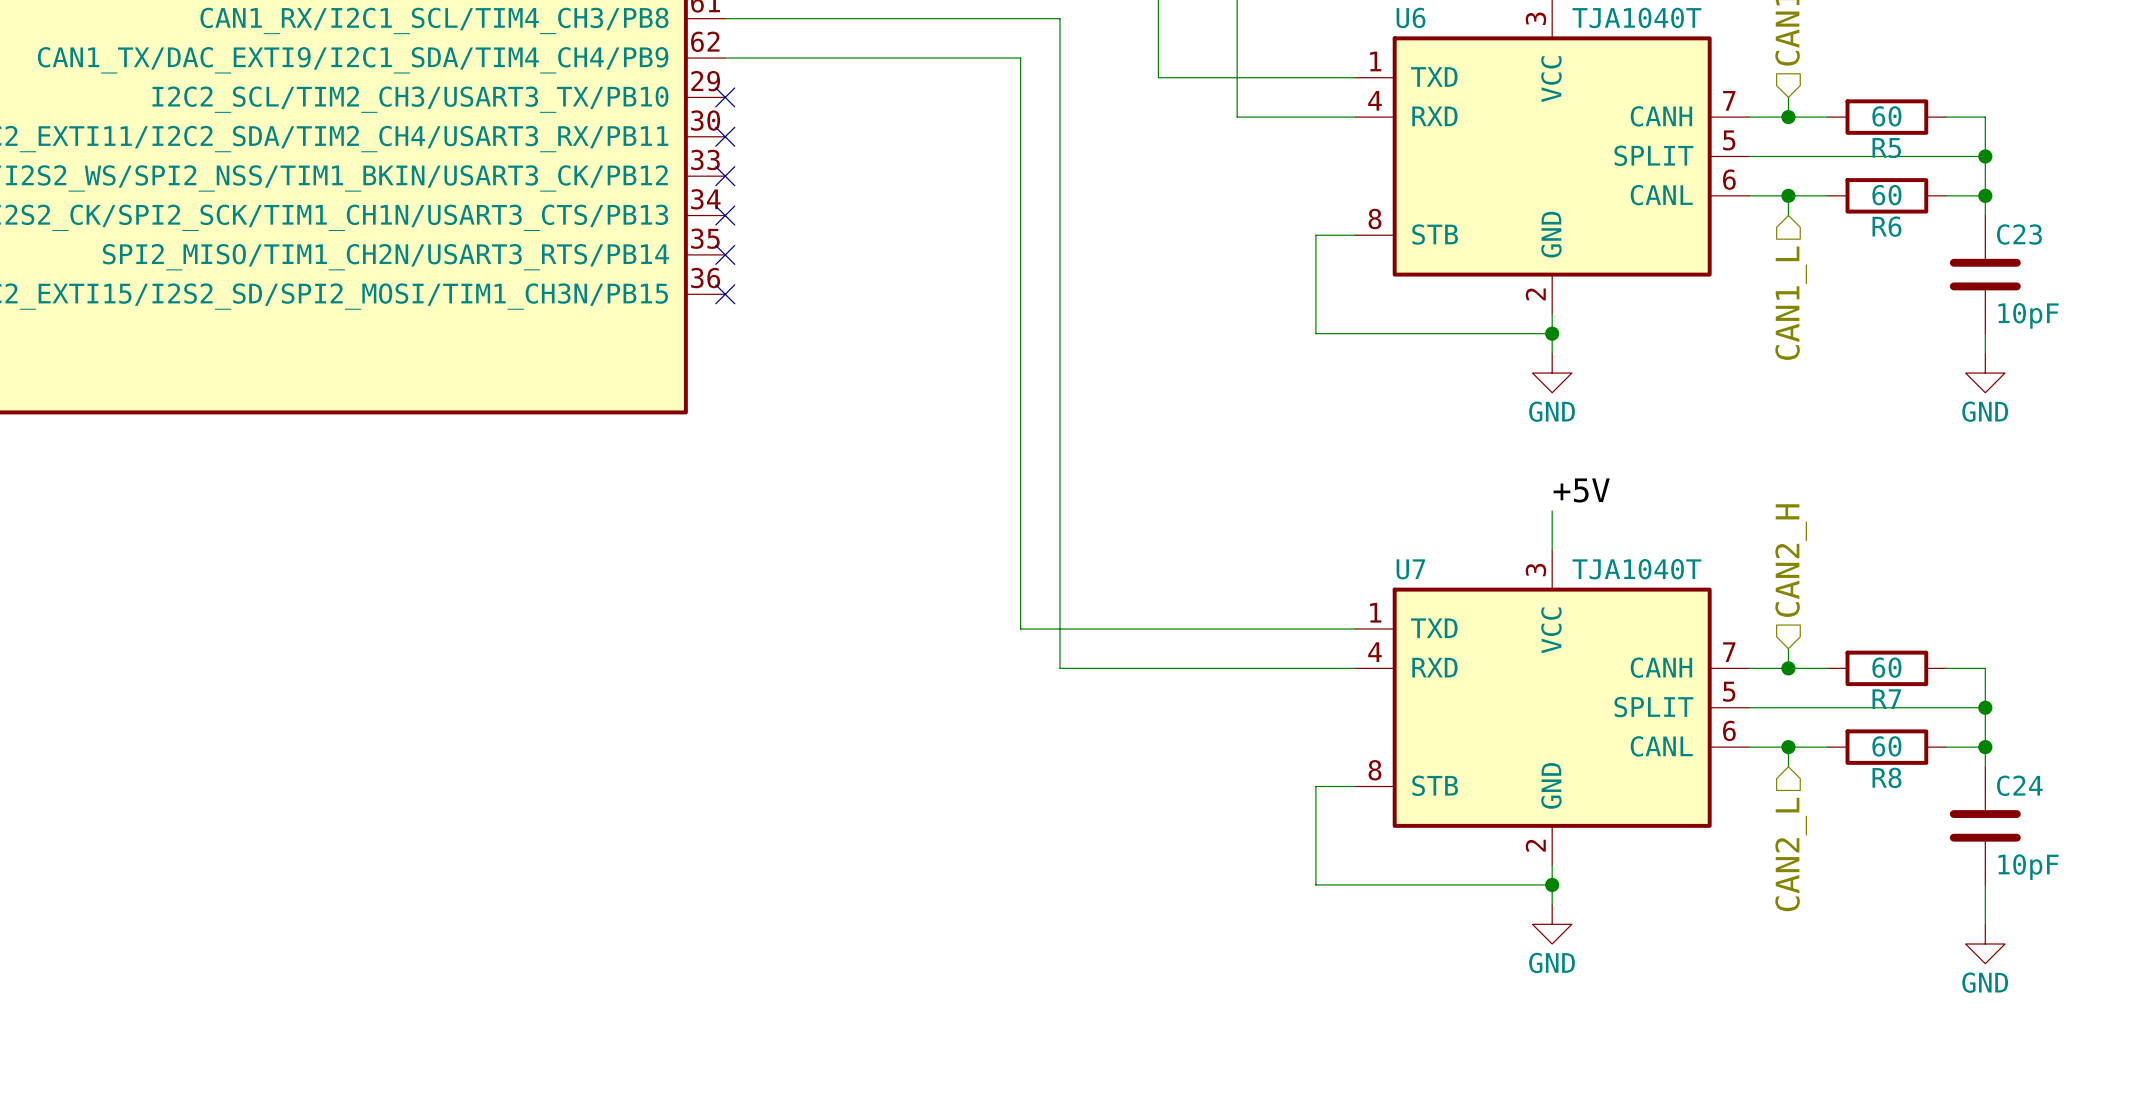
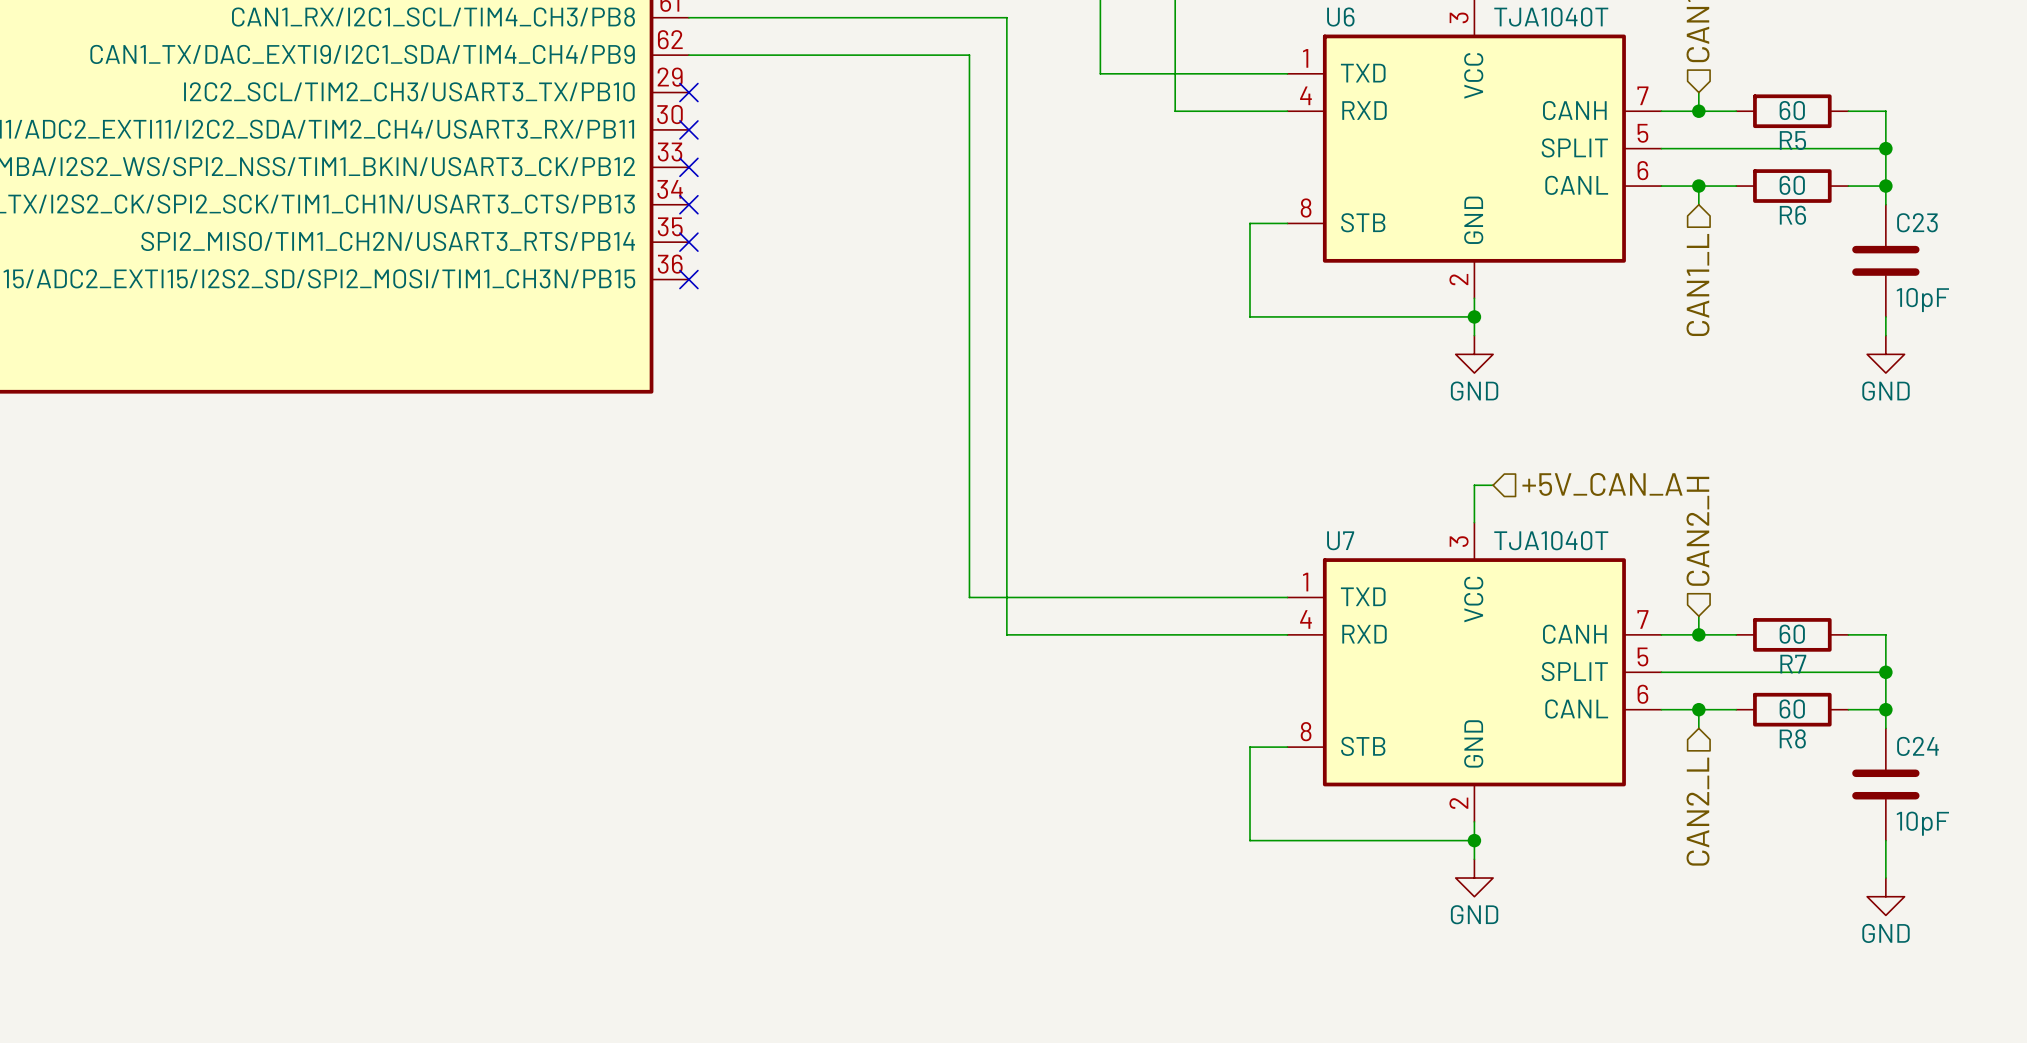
label: +5V (1581, 490) -> none
wire: none -> (1474, 485) (1493, 485)
hierarchical label: none -> +5V_CAN_A (1602, 484)

